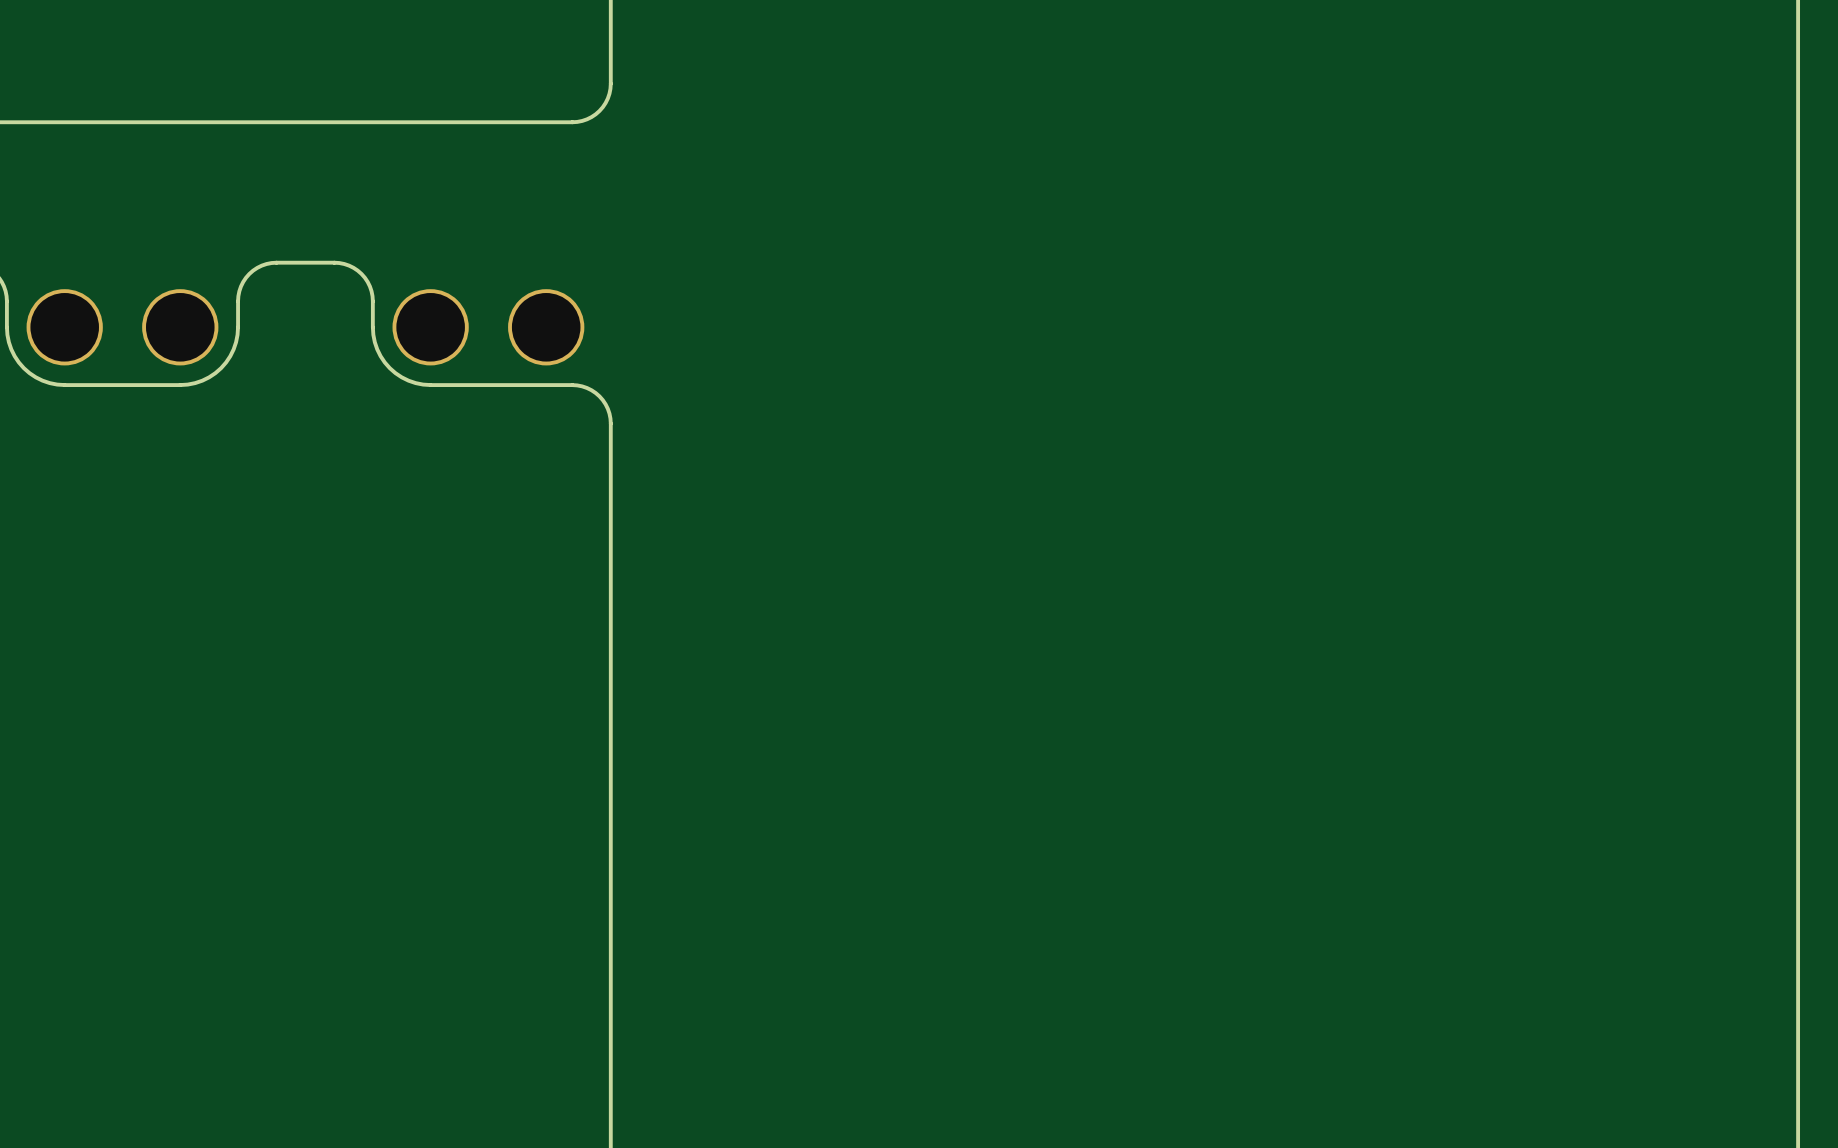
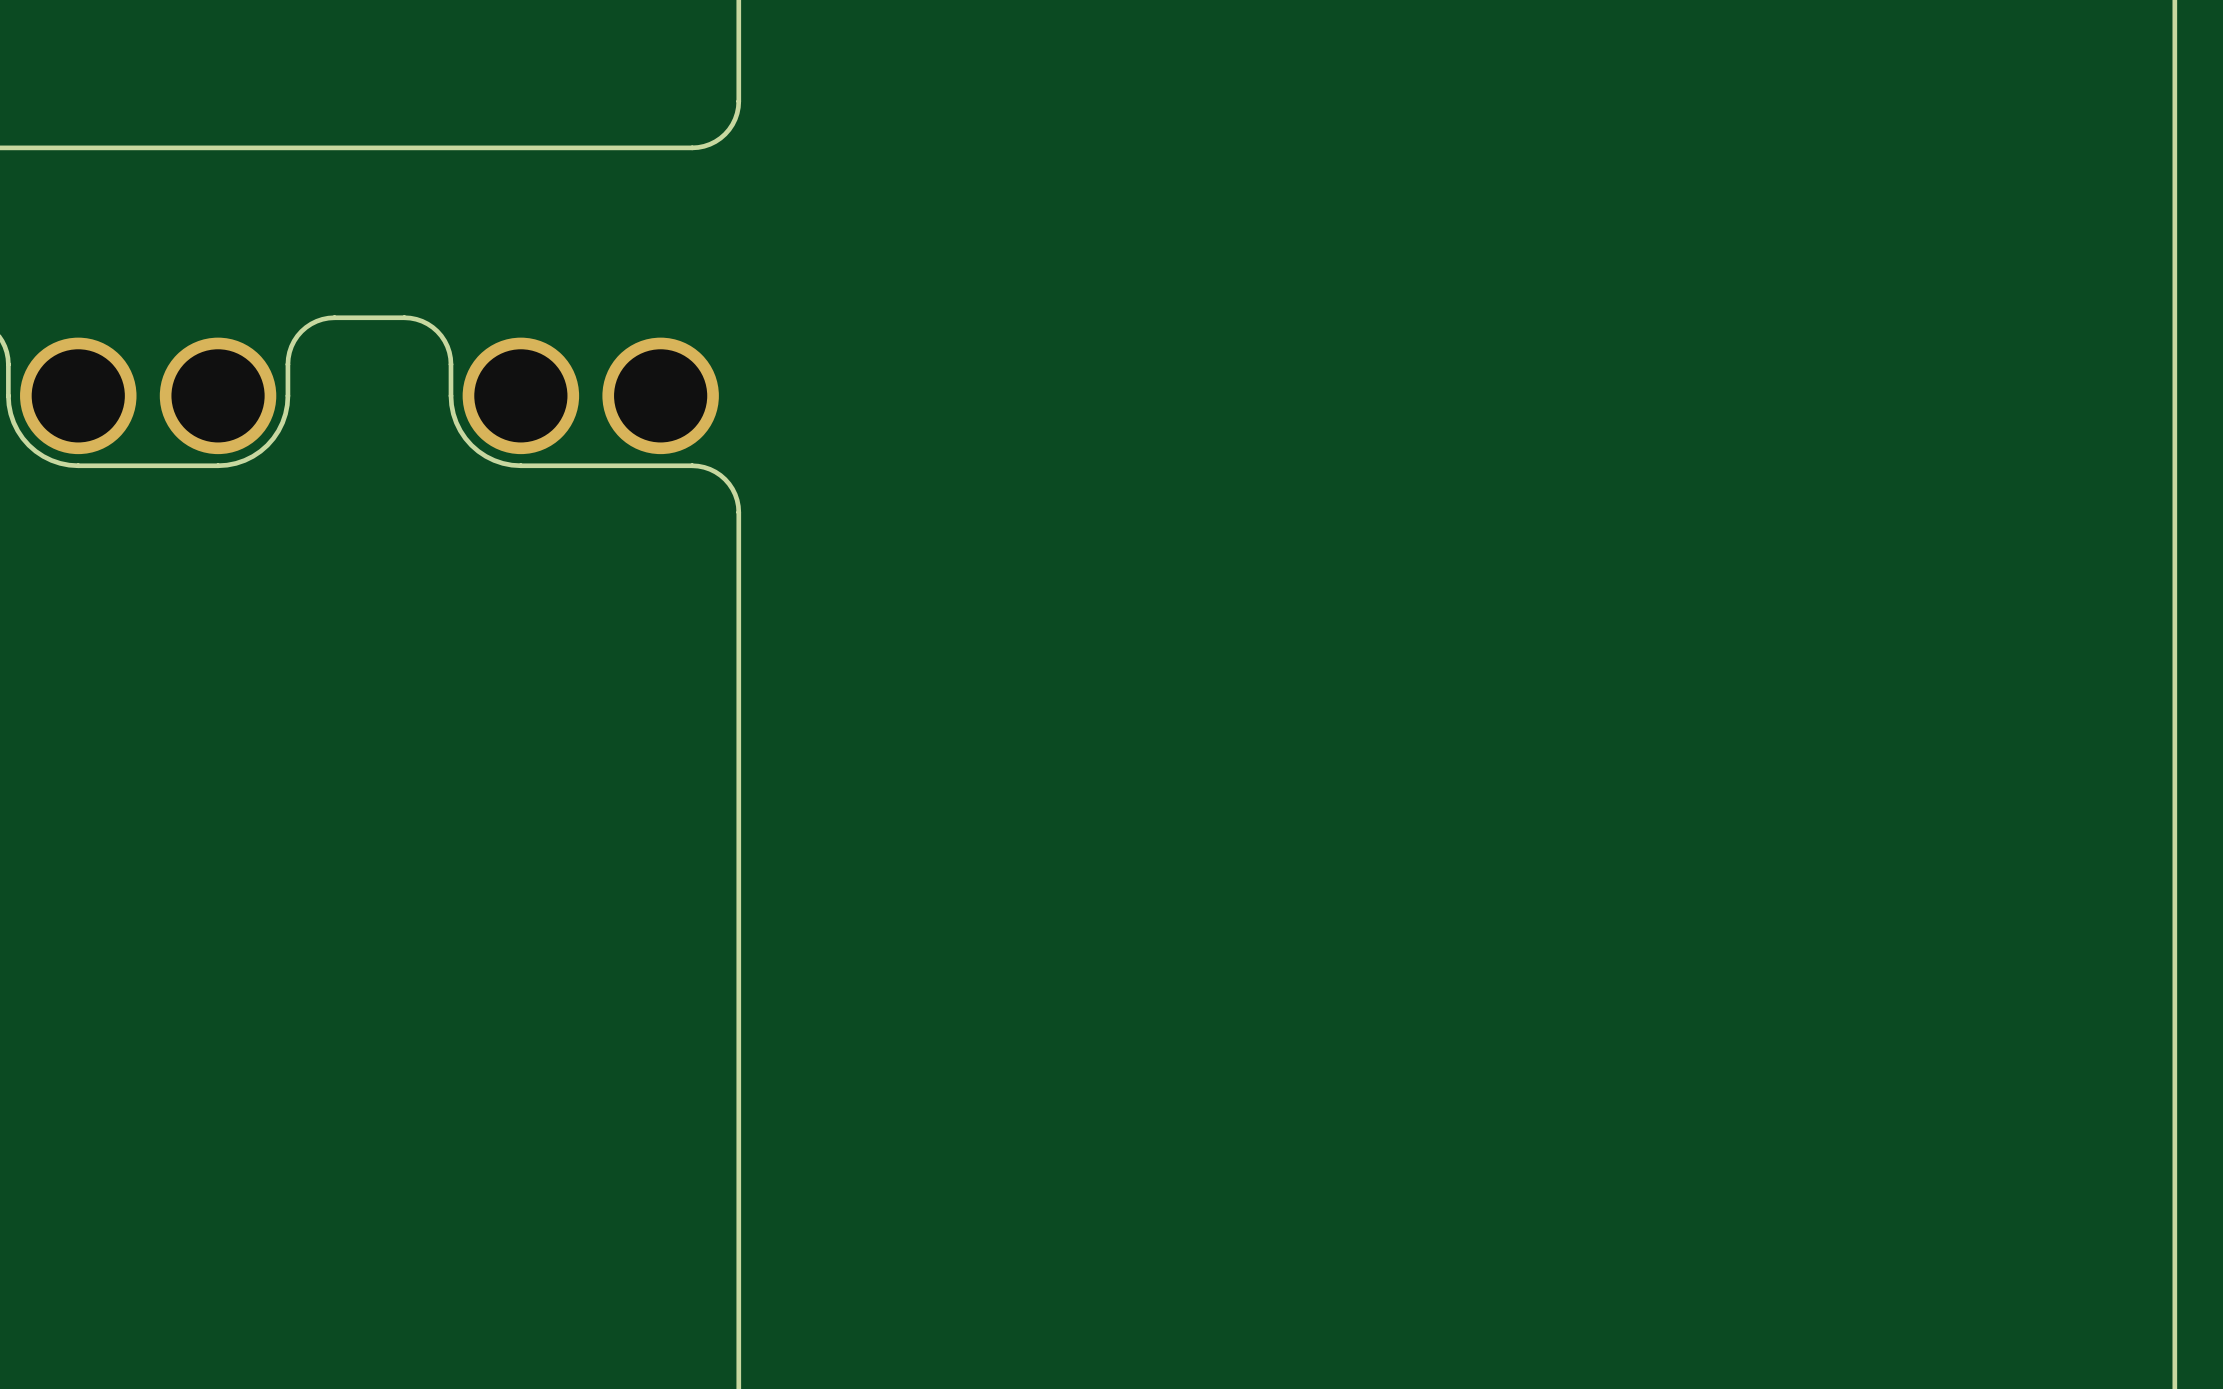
part footprint: [26, 289, 103, 366] -> [20, 337, 137, 455]
part footprint: [142, 289, 219, 366] -> [159, 337, 277, 455]
part footprint: [392, 289, 469, 366] -> [462, 337, 580, 455]
part footprint: [508, 289, 585, 366] -> [602, 337, 719, 455]

